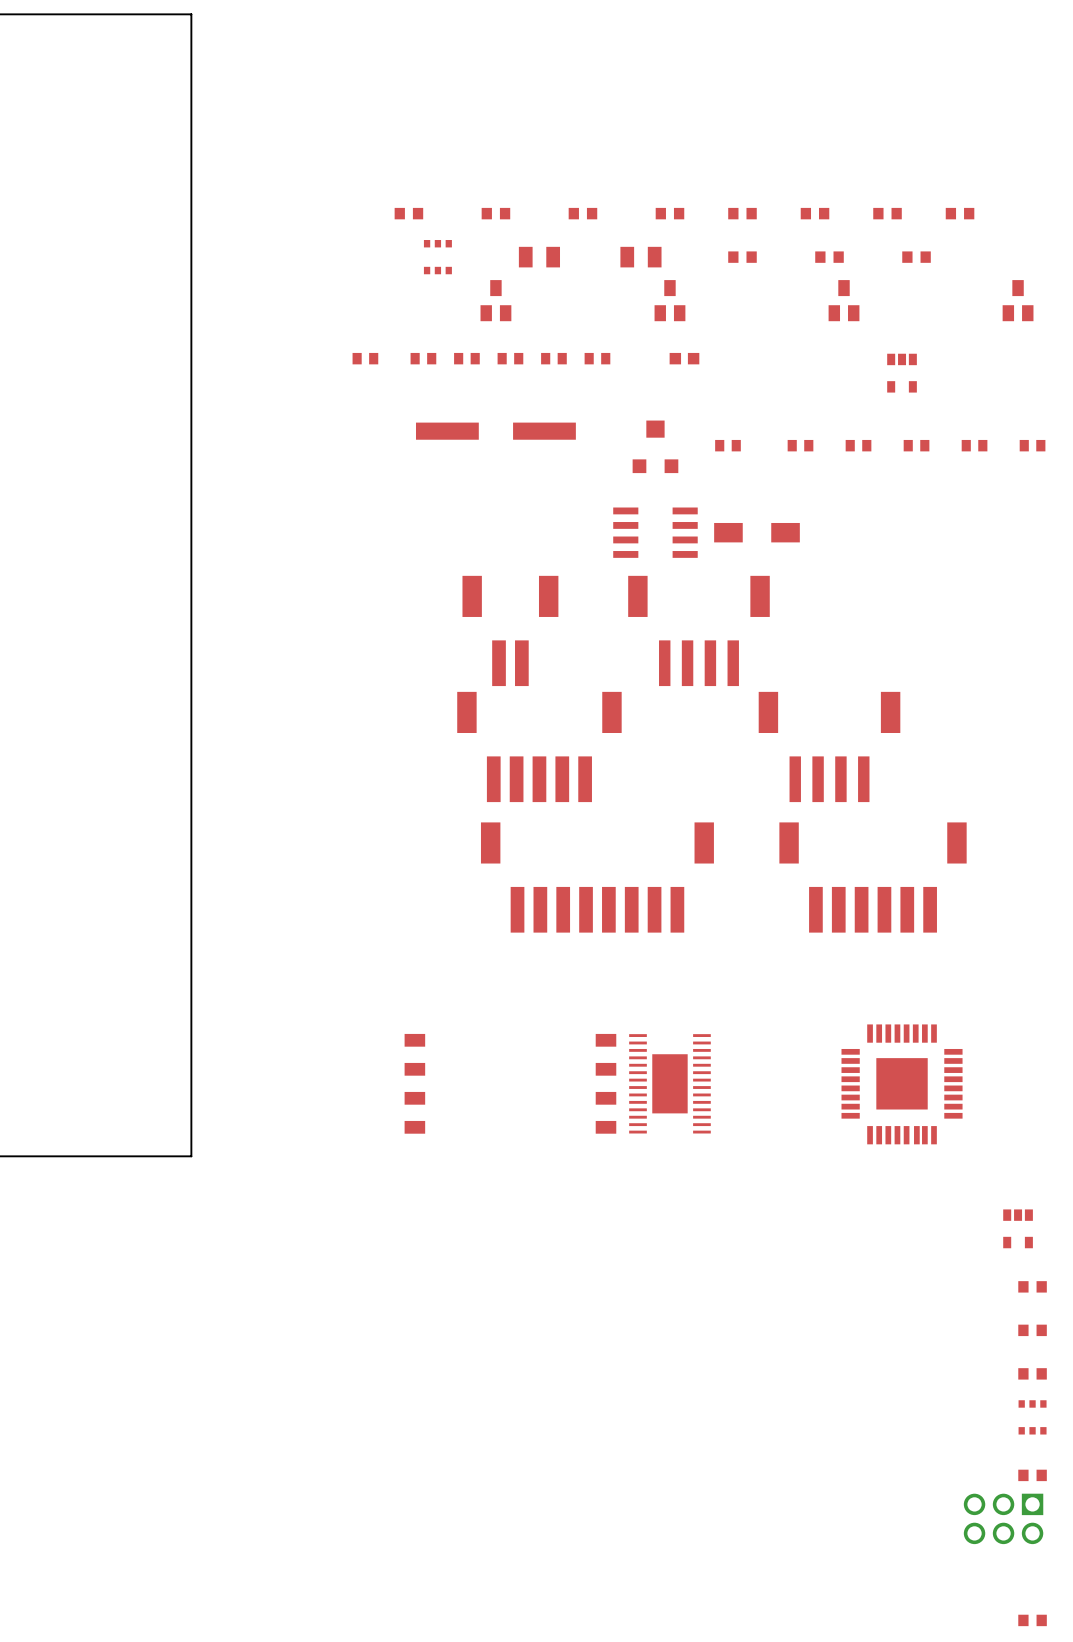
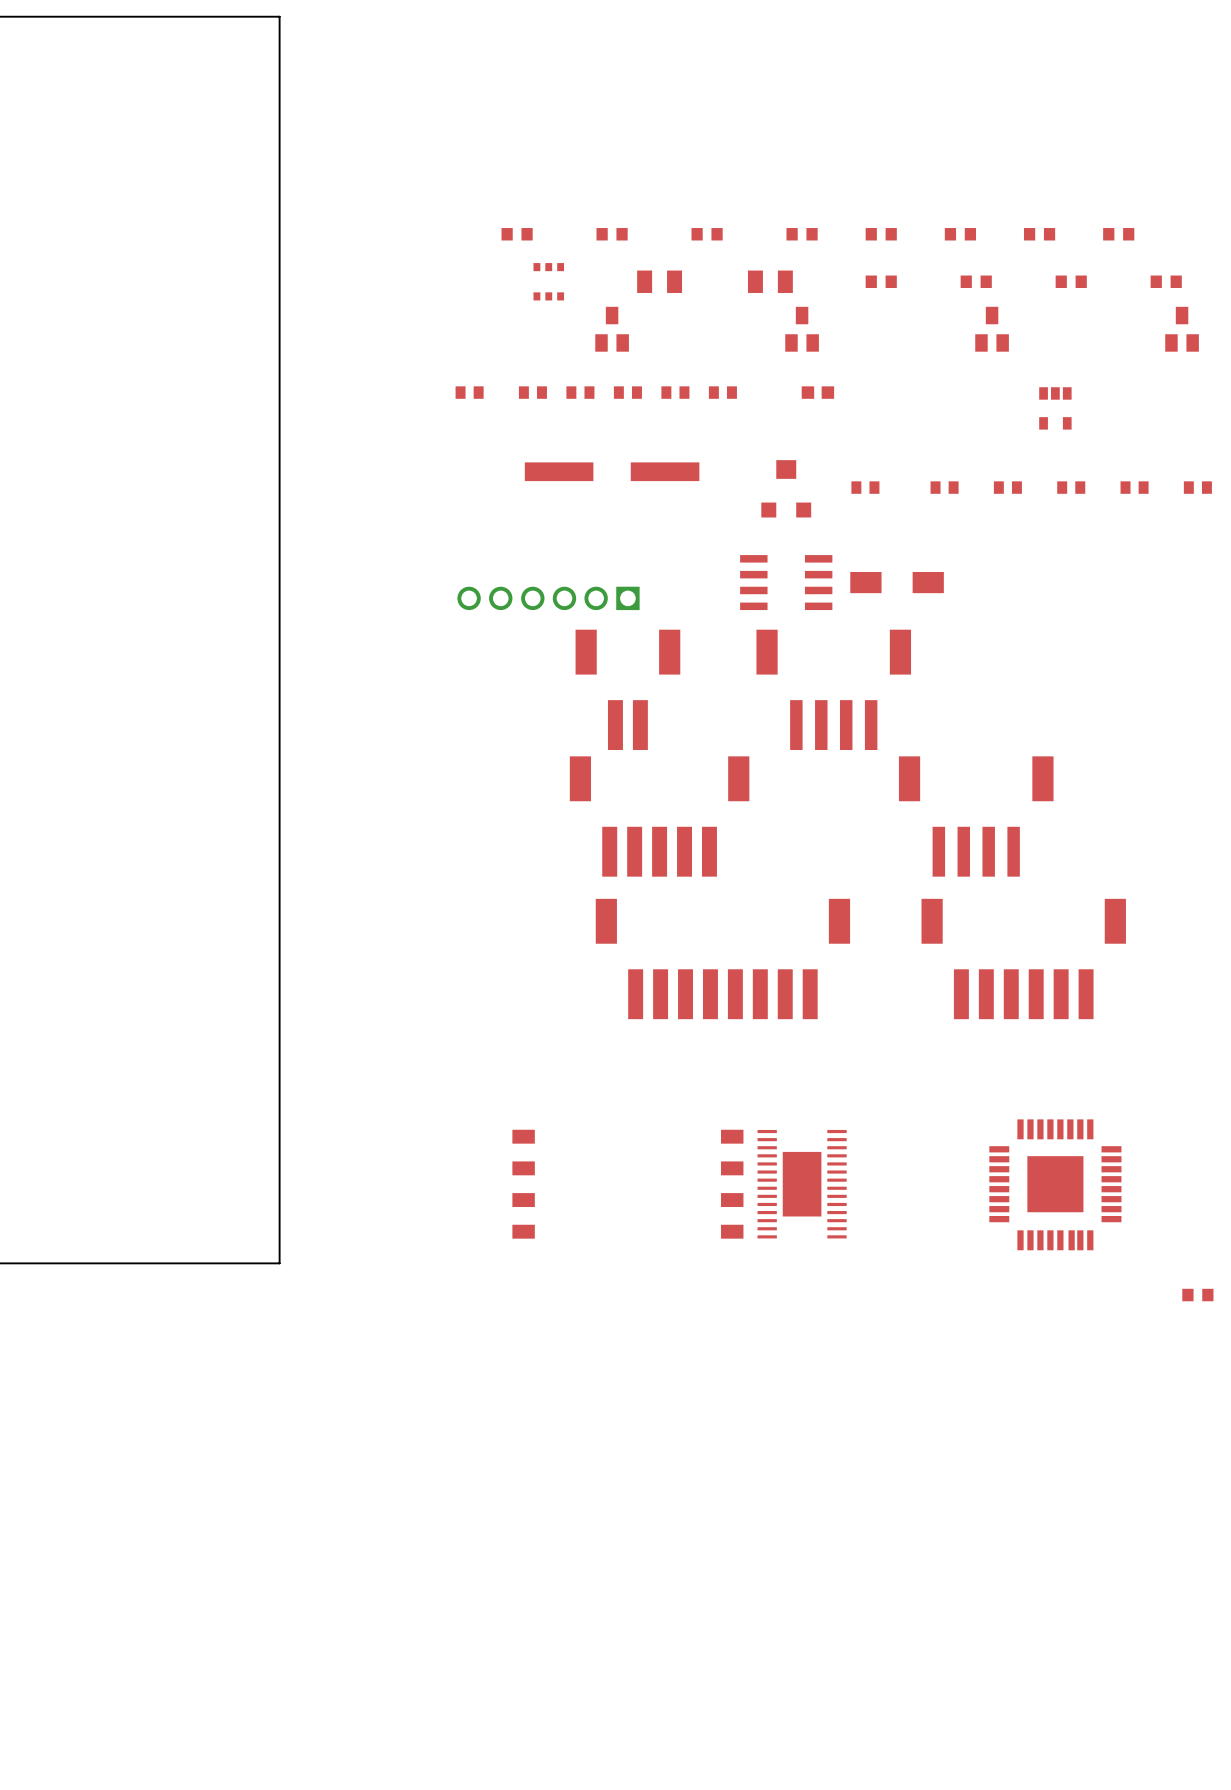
part: none -> (1166, 281)
part: none -> (548, 598)
part: none -> (1197, 1295)
part: (1018, 1228) -> none
part: (1032, 1286) -> none
part: (1032, 1330) -> none
part: (1032, 1373) -> none
part: (1032, 1417) -> none
part: (1032, 1475) -> none
part: (1003, 1518) -> none
part: (1032, 1620) -> none

